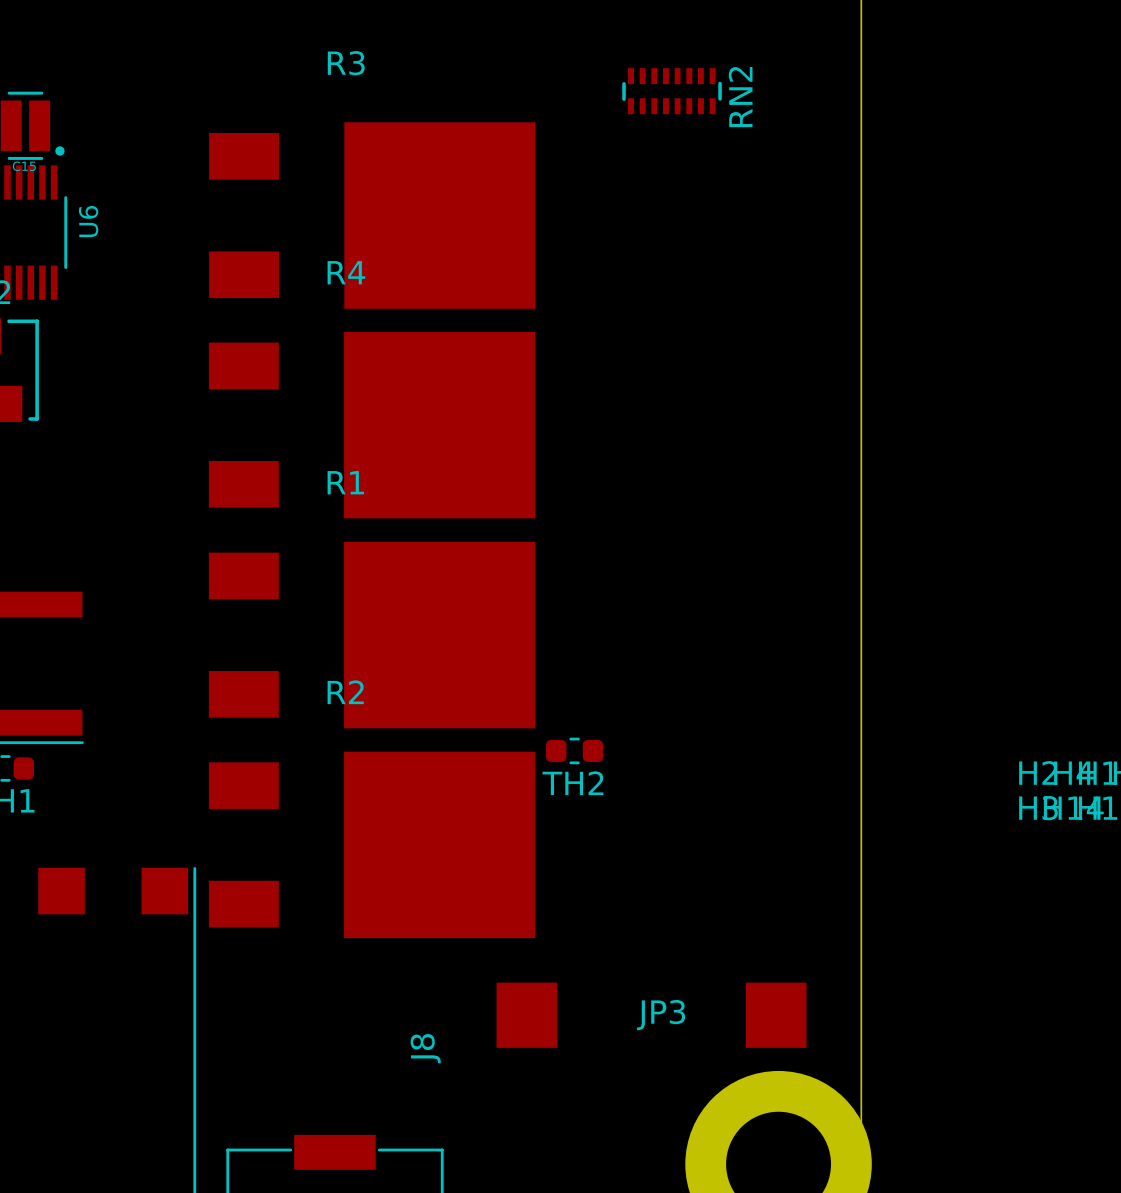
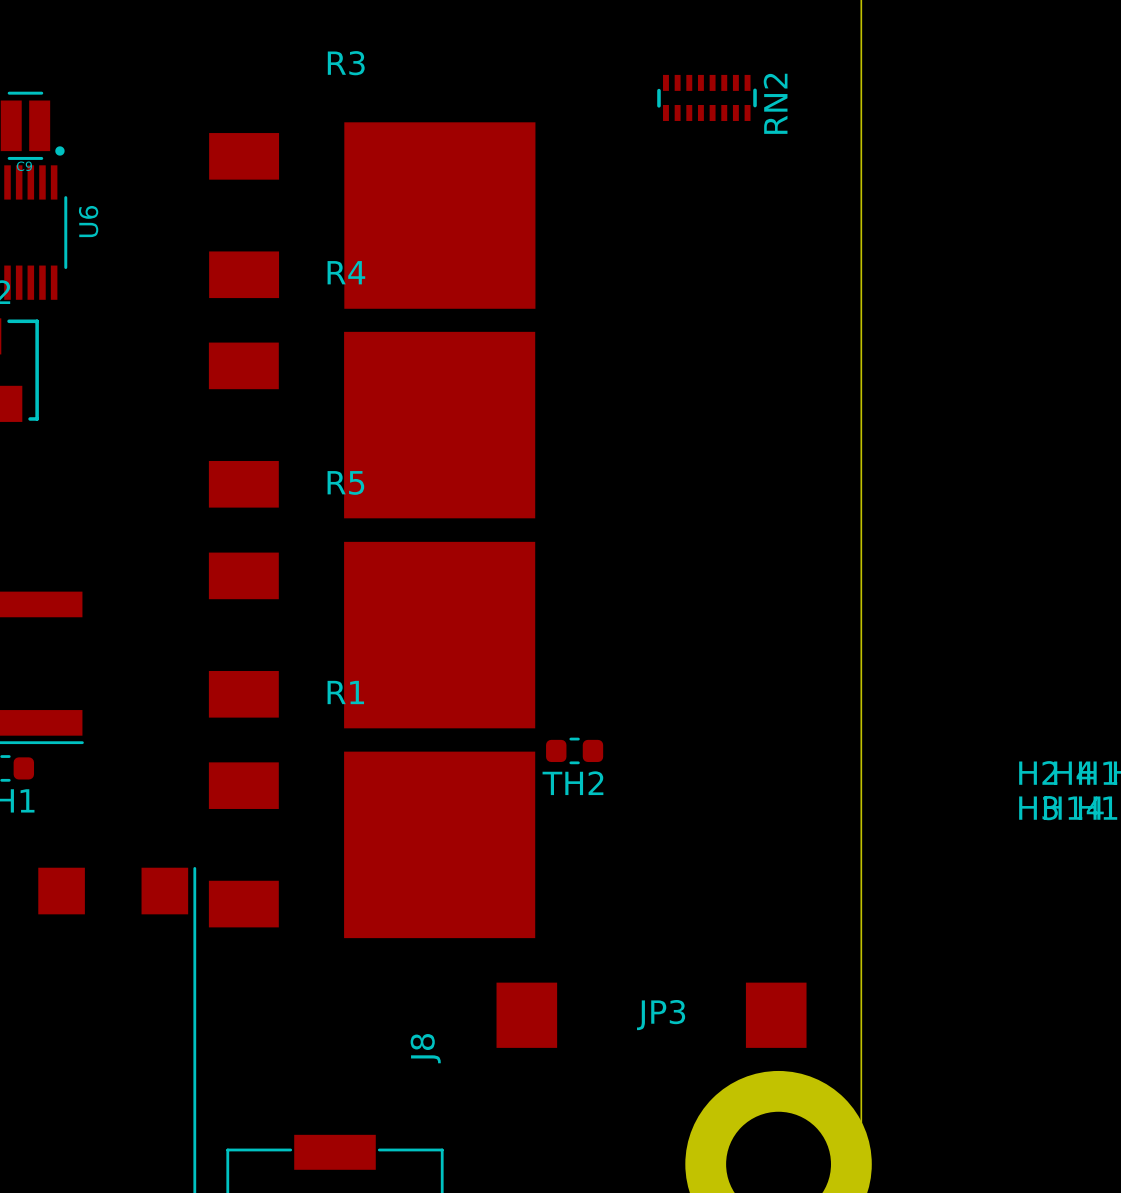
RN2 position: (672, 91) -> (707, 97)
C15 name: C15 (24, 166) -> C9 (24, 166)
R1 name: R1 (345, 482) -> R5 (345, 482)
R2 name: R2 (345, 692) -> R1 (345, 692)

